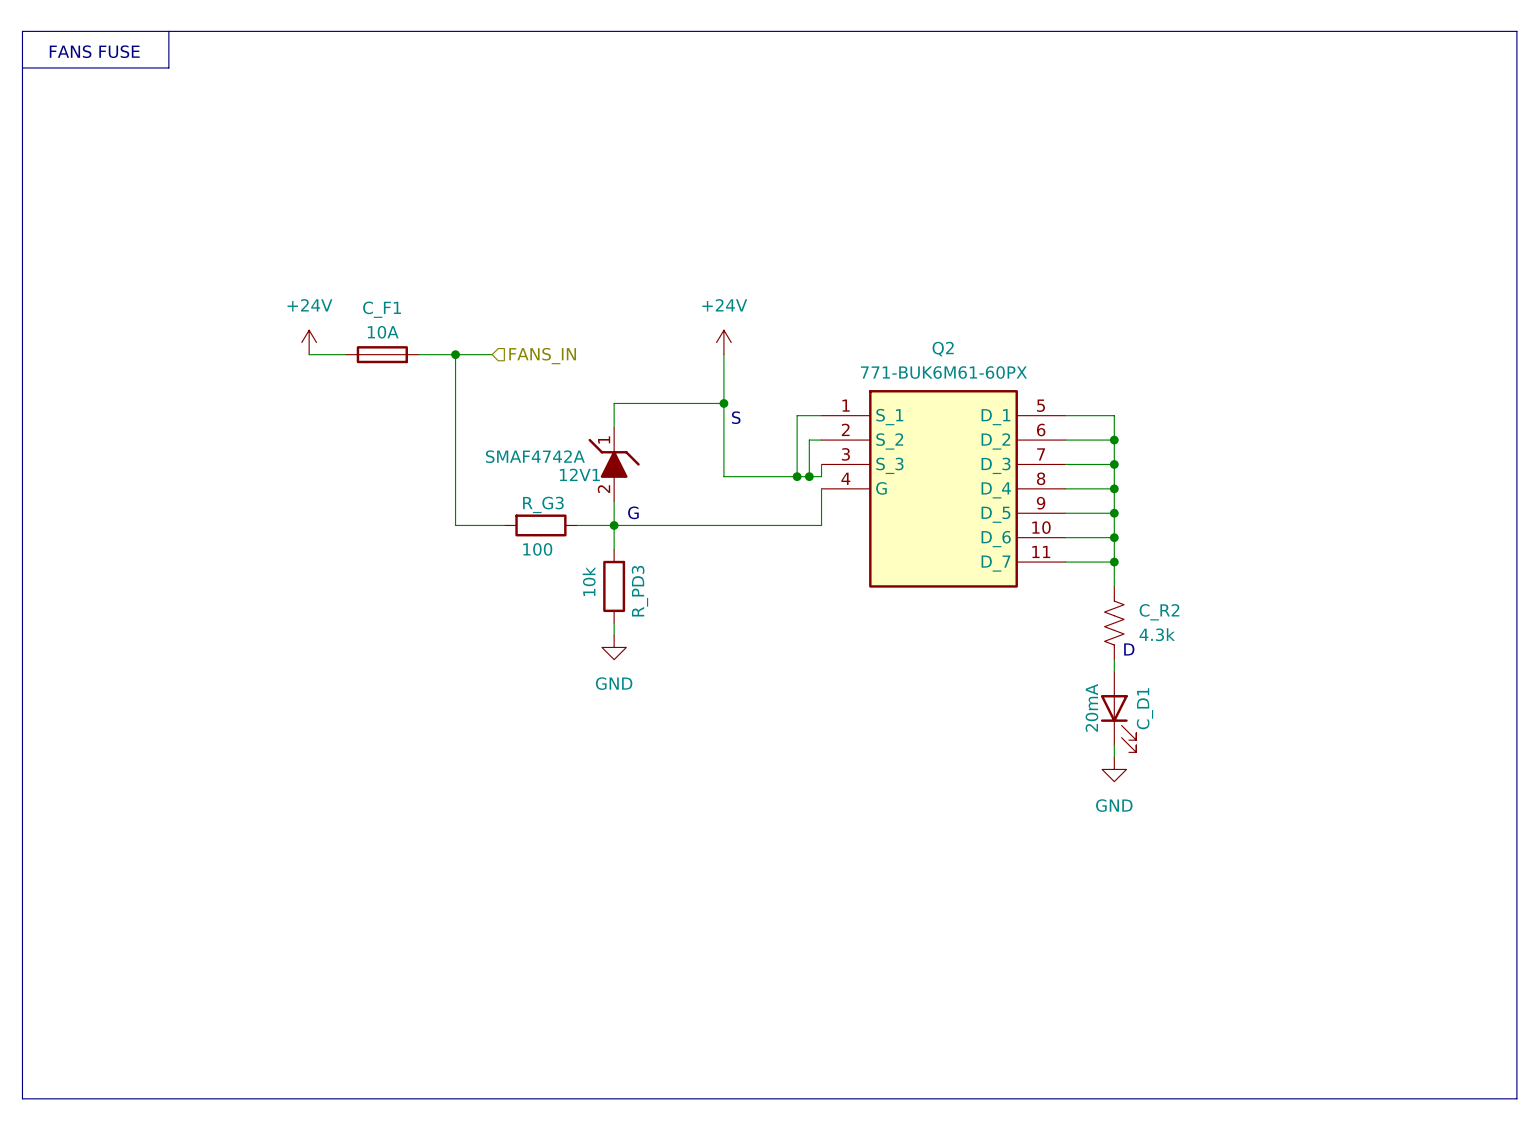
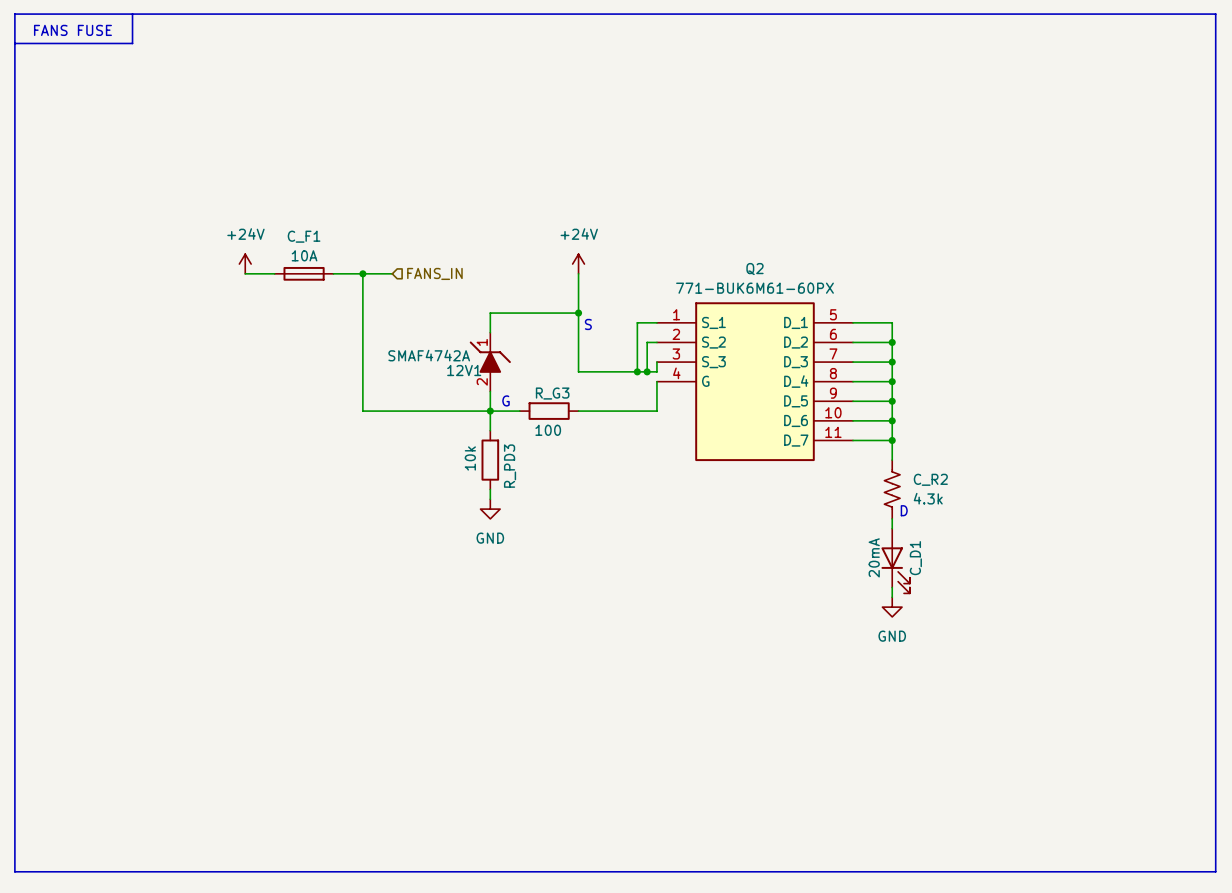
R_G3 position: (540, 525) -> (549, 411)
wire: (650, 525) (723, 525) -> (402, 411) (460, 411)

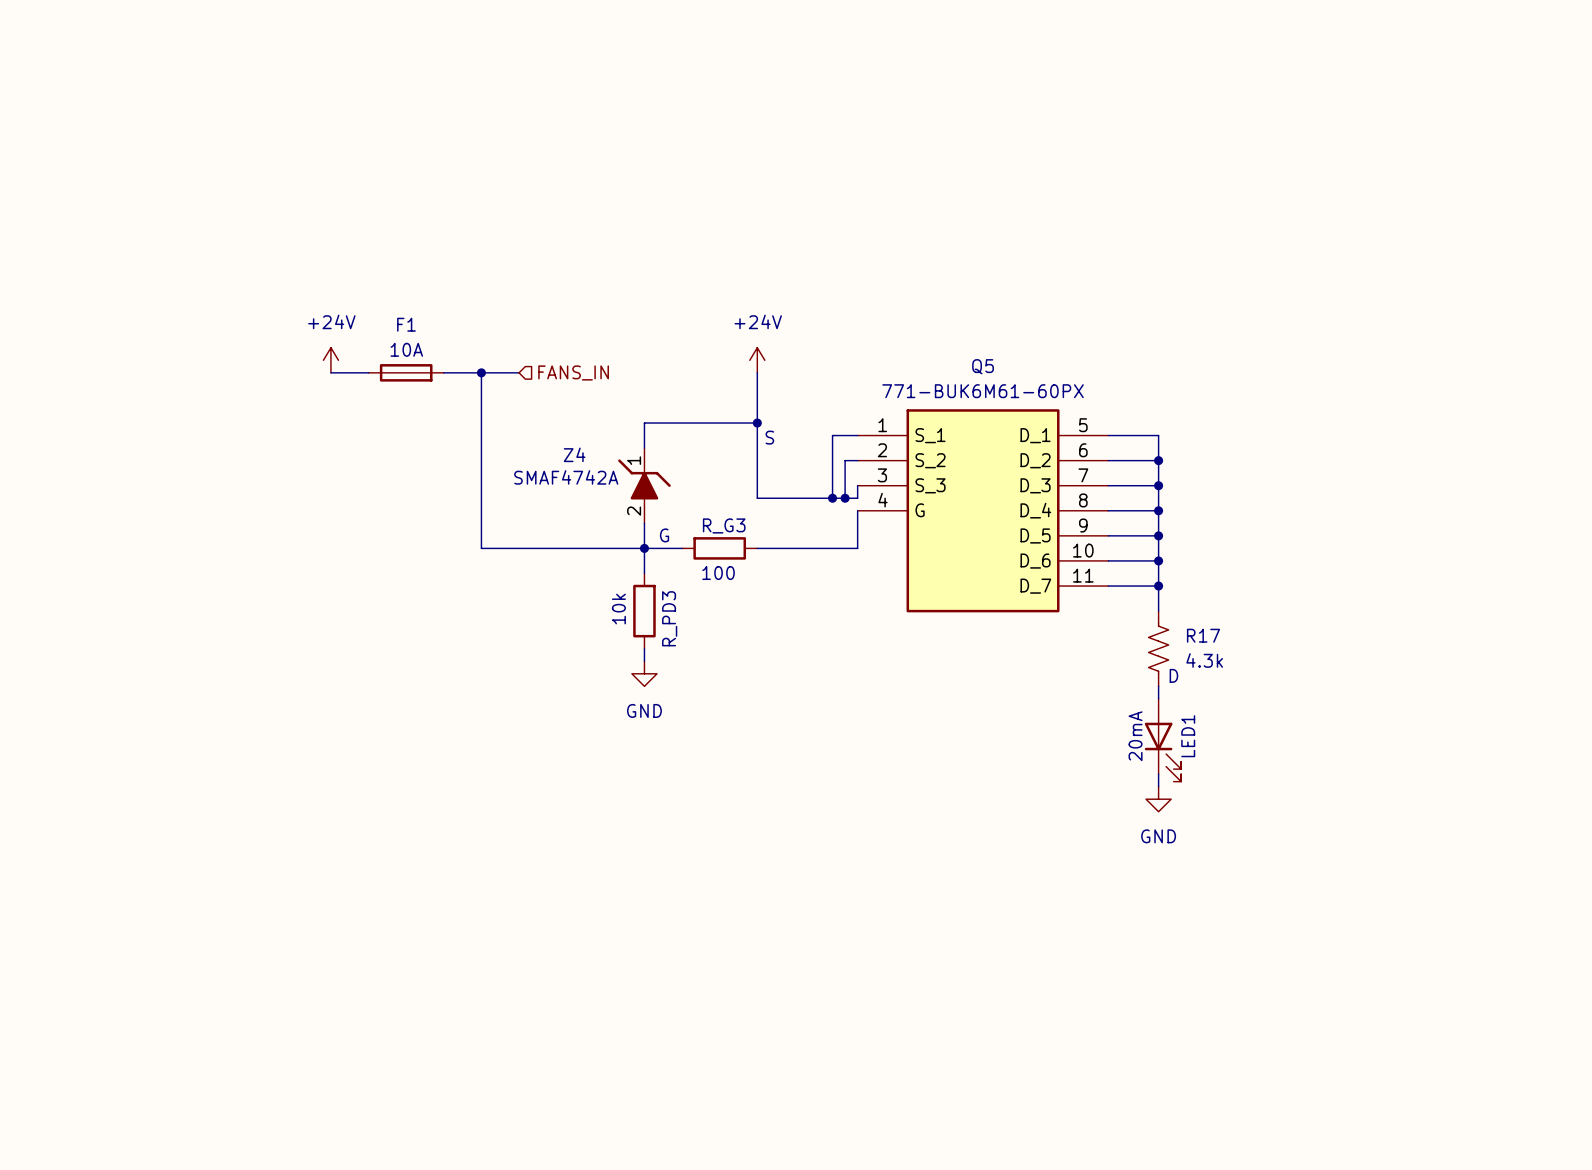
line: (14, 14) (1215, 14) (1215, 871) (14, 871) (14, 14) -> none
line: (132, 14) (132, 43) (14, 43) -> none
text: FANS FUSE (72, 30) -> none
C_F1 name: C_F1 (304, 236) -> F1 (406, 324)
Q2 name: Q2 (754, 269) -> Q5 (983, 366)
12V1 name: 12V1 (464, 370) -> Z4 (574, 454)
C_R2 name: C_R2 (930, 479) -> R17 (1203, 635)
C_D1 name: C_D1 (915, 558) -> LED1 (1188, 736)

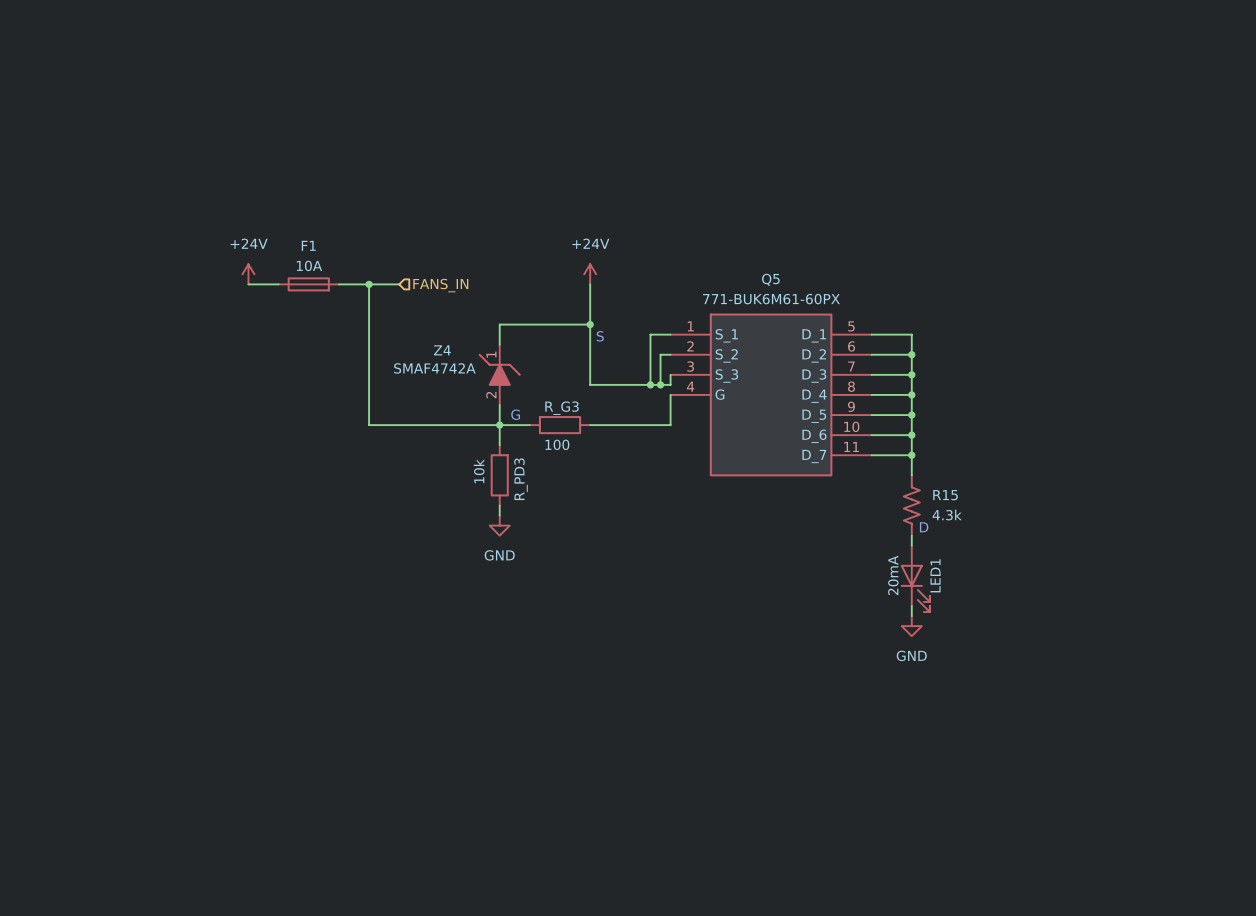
R17 name: R17 (1203, 635) -> R15 (945, 495)

